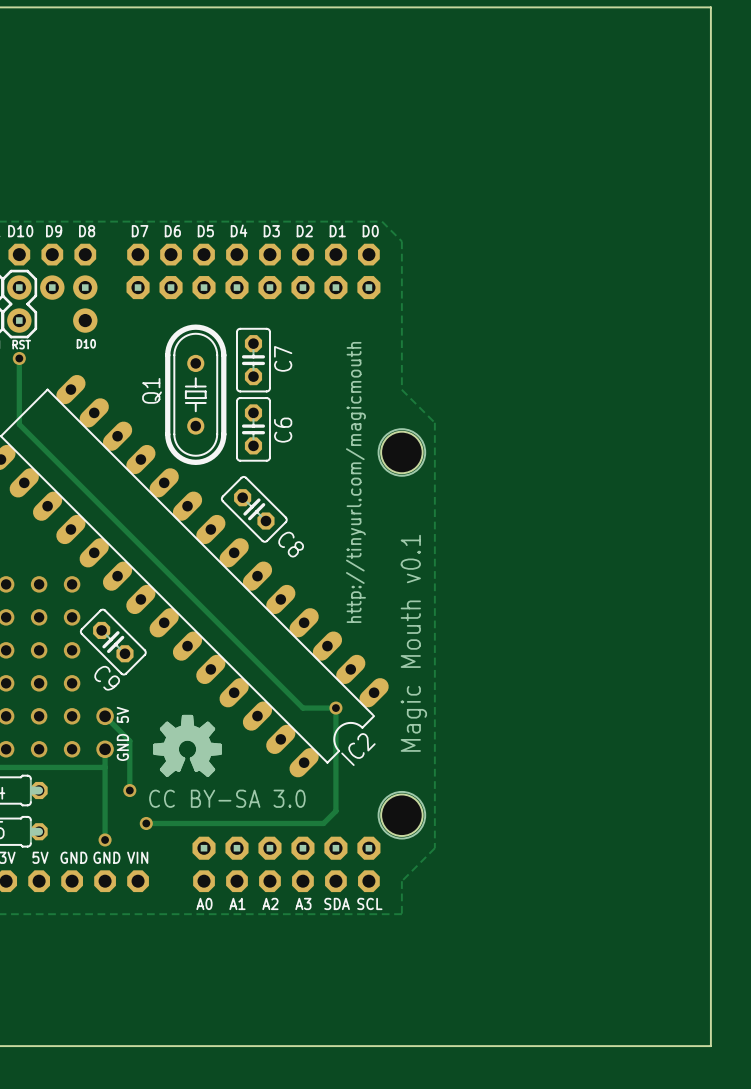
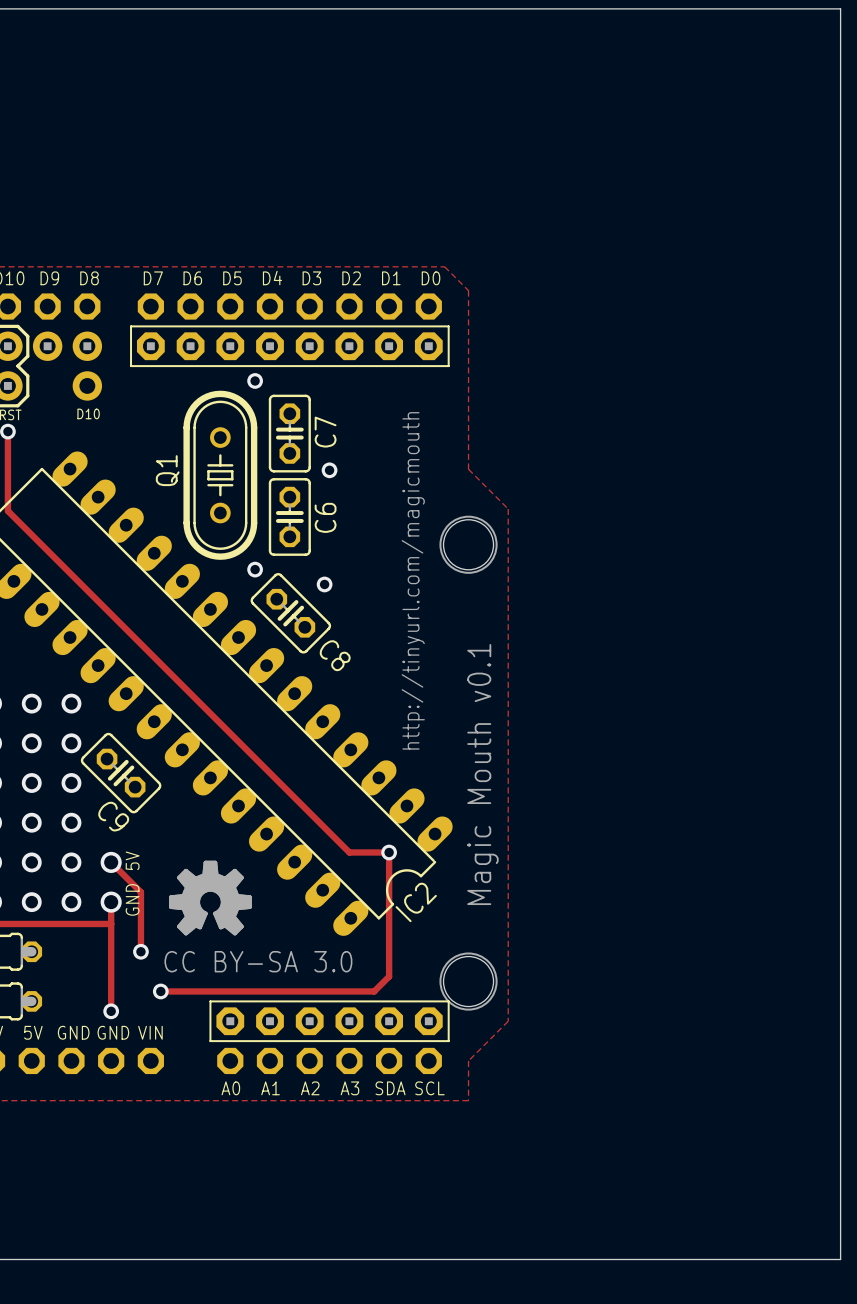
part footprint: [126, 276, 381, 300] -> [130, 325, 450, 368]
via: none -> (255, 380)
via: none -> (329, 470)
via: none -> (255, 569)
via: none -> (324, 584)
part footprint: [192, 836, 381, 860] -> [209, 1000, 450, 1043]

